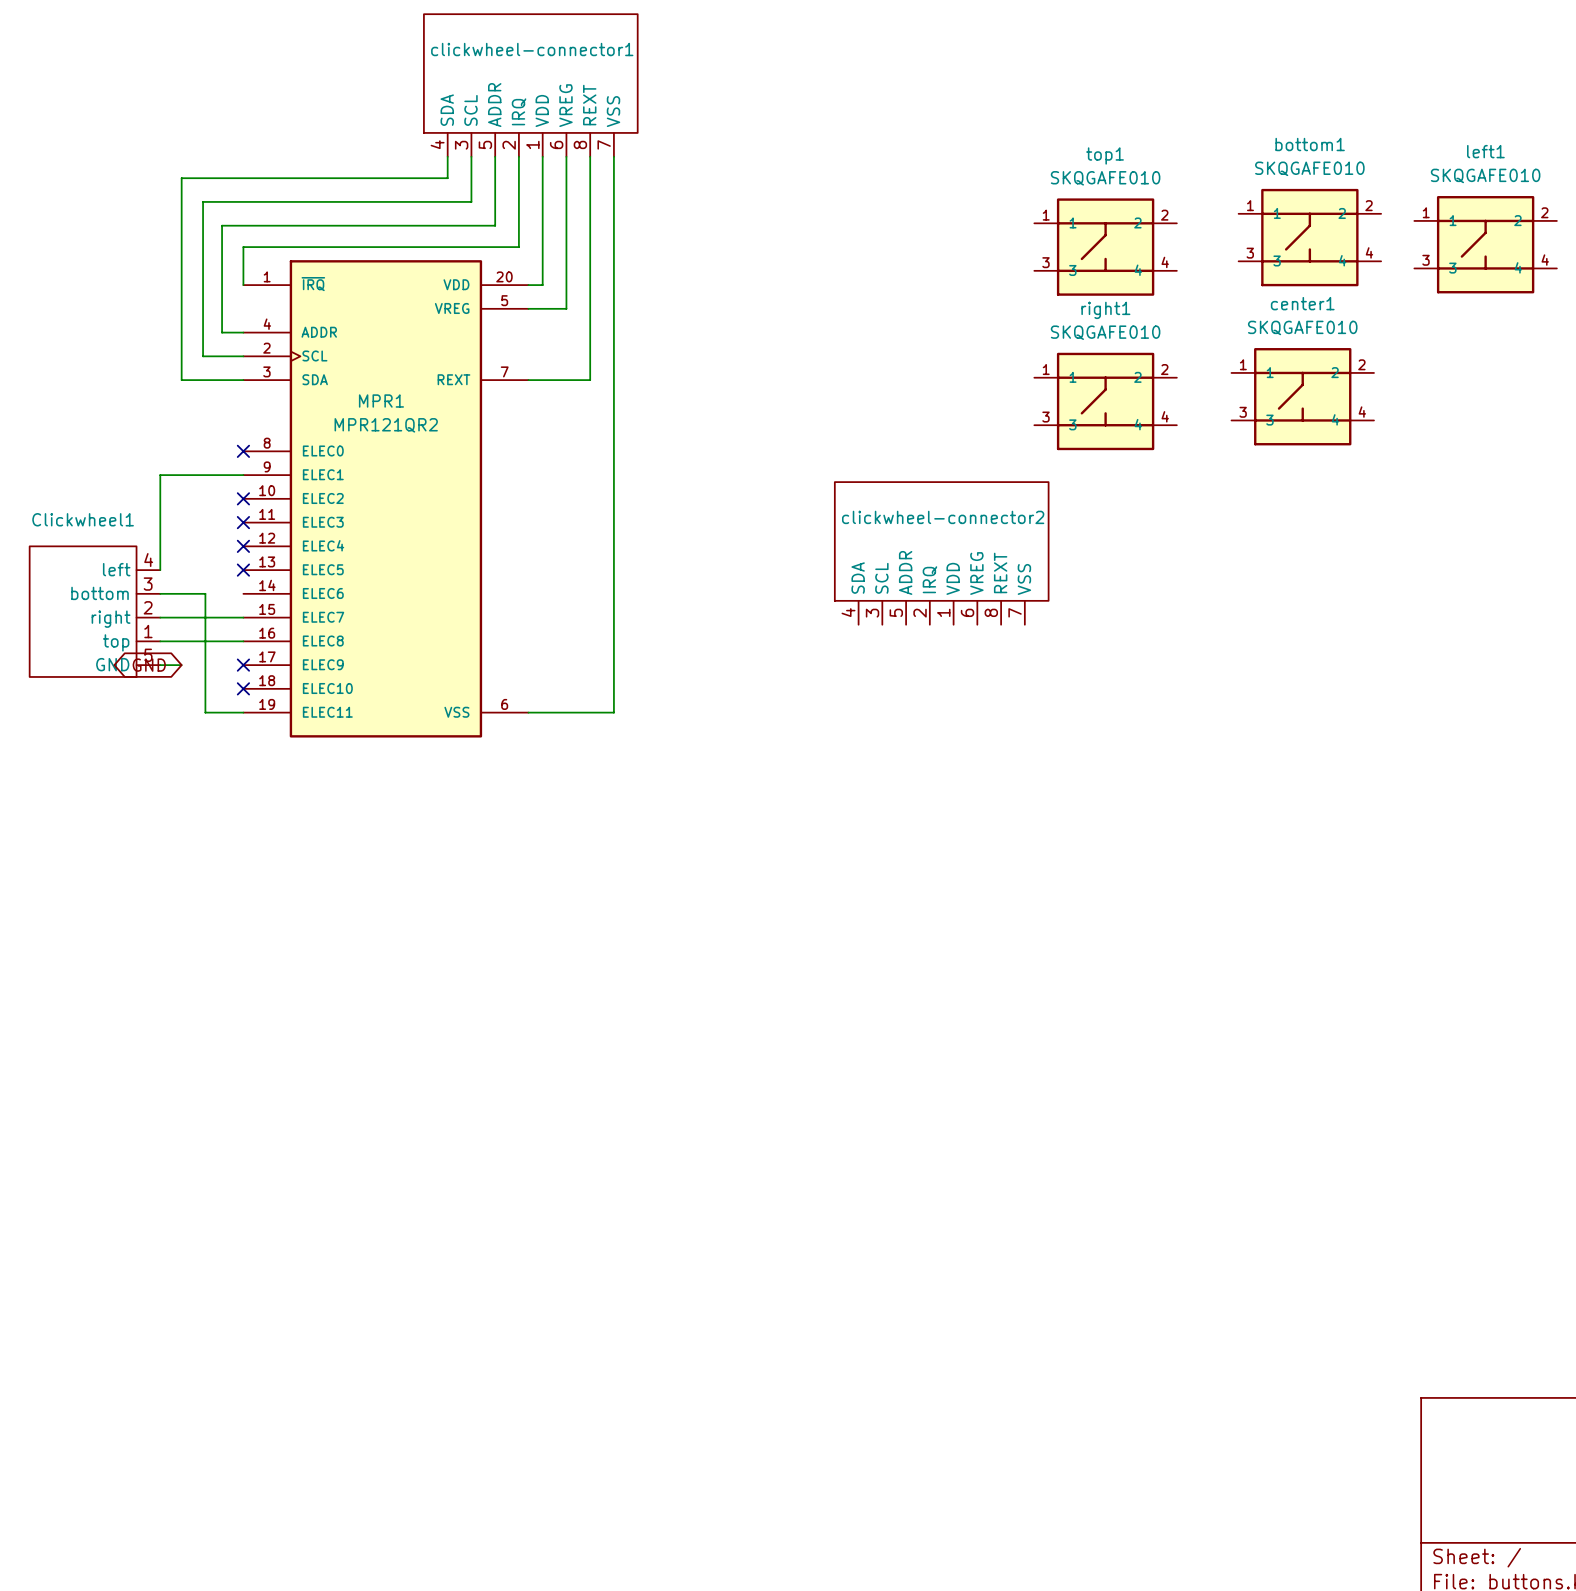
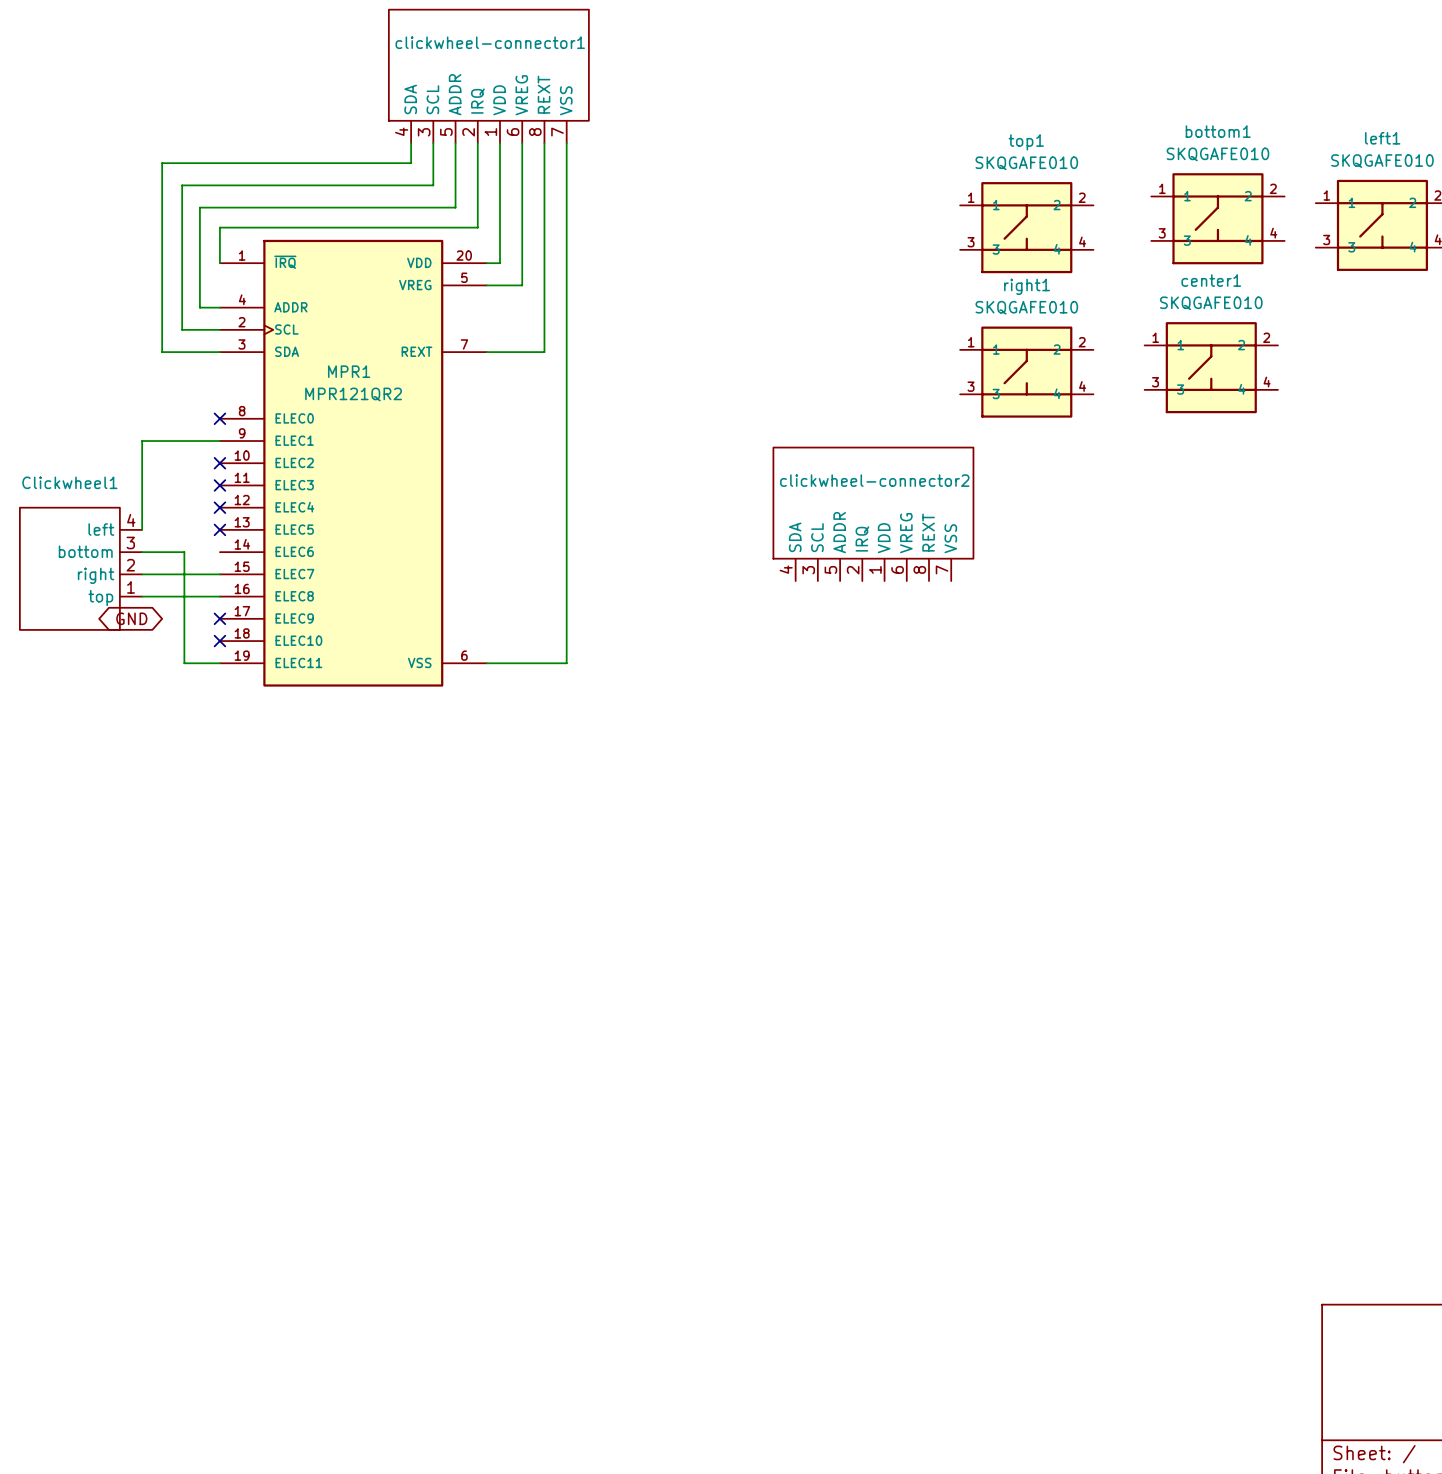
Clickwheel1 symbol: [29, 546, 161, 677] -> [19, 507, 143, 630]
wire: (160, 665) (181, 665) -> none

